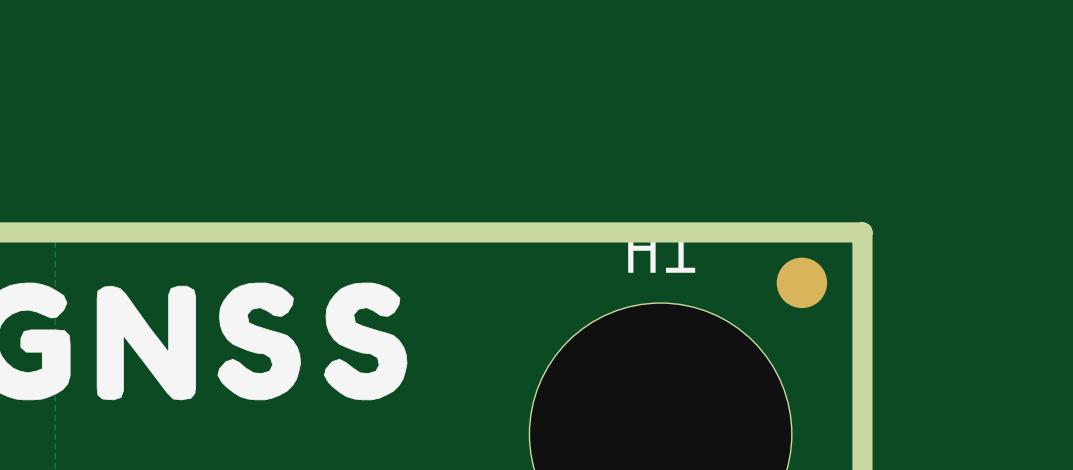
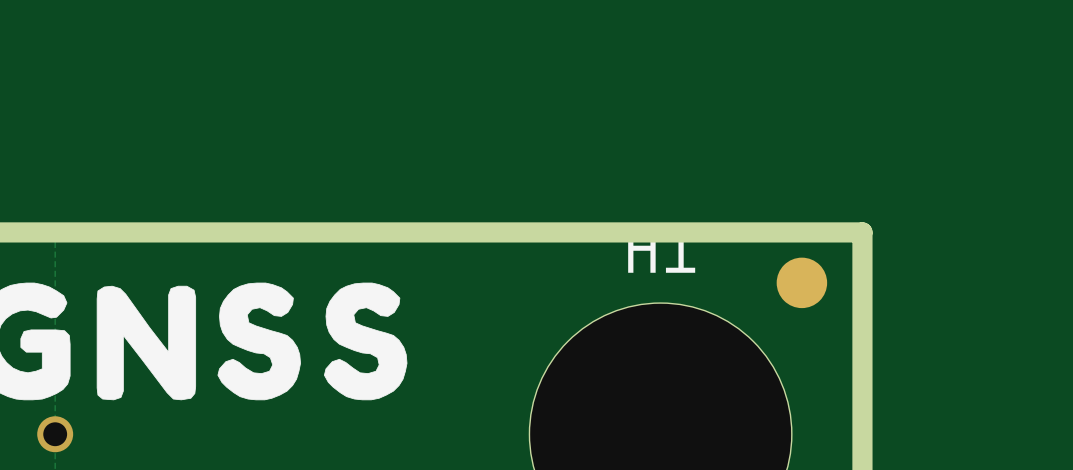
via: none -> (55, 434)

